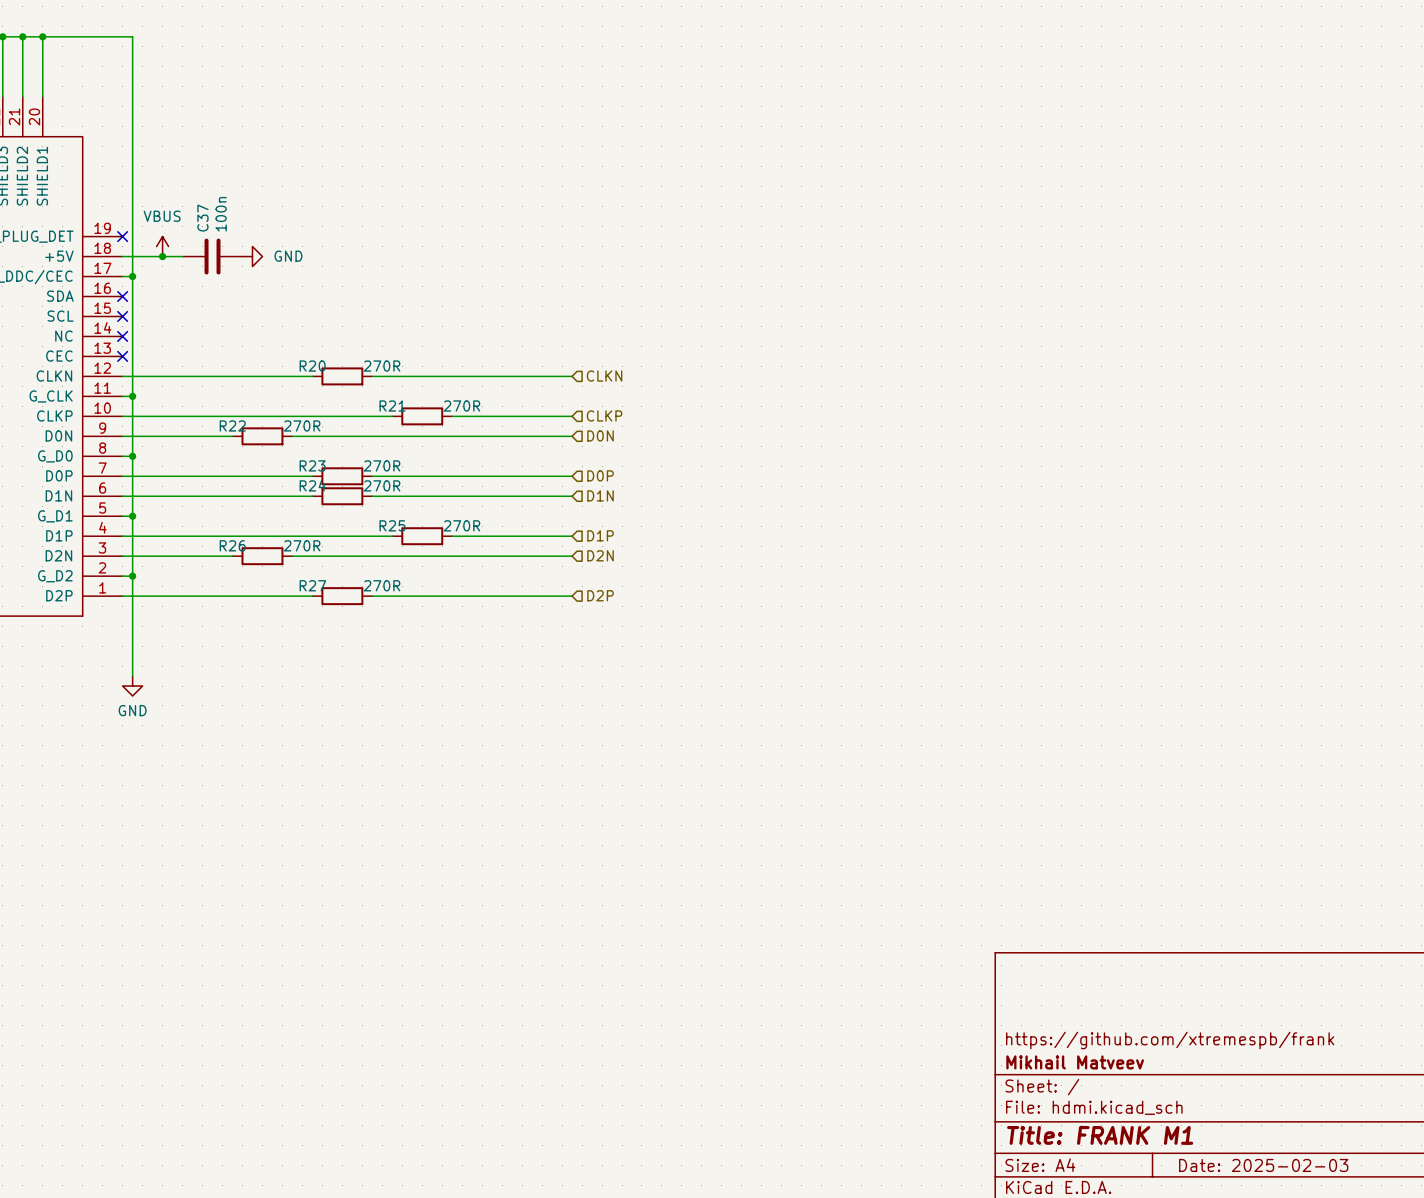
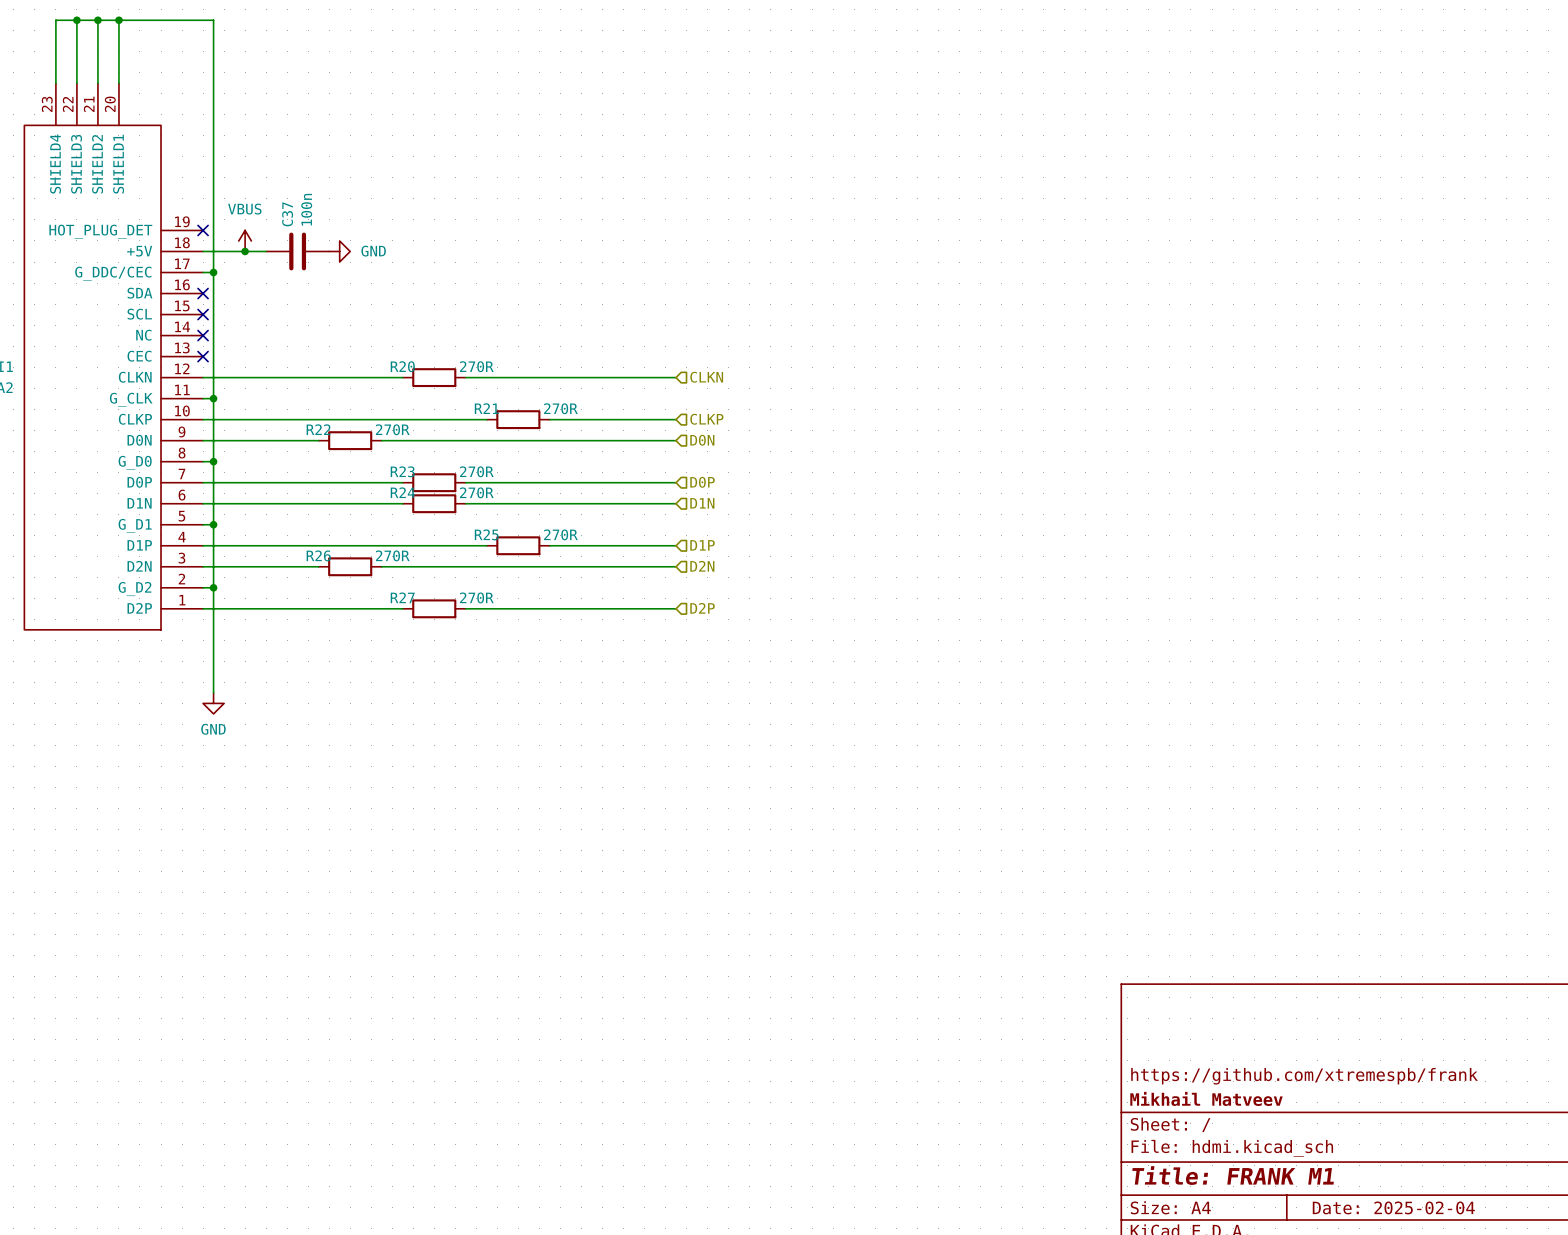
title block: Date: 2025-02-03 (1263, 1165) -> Date: 2025-02-04 (1393, 1207)

